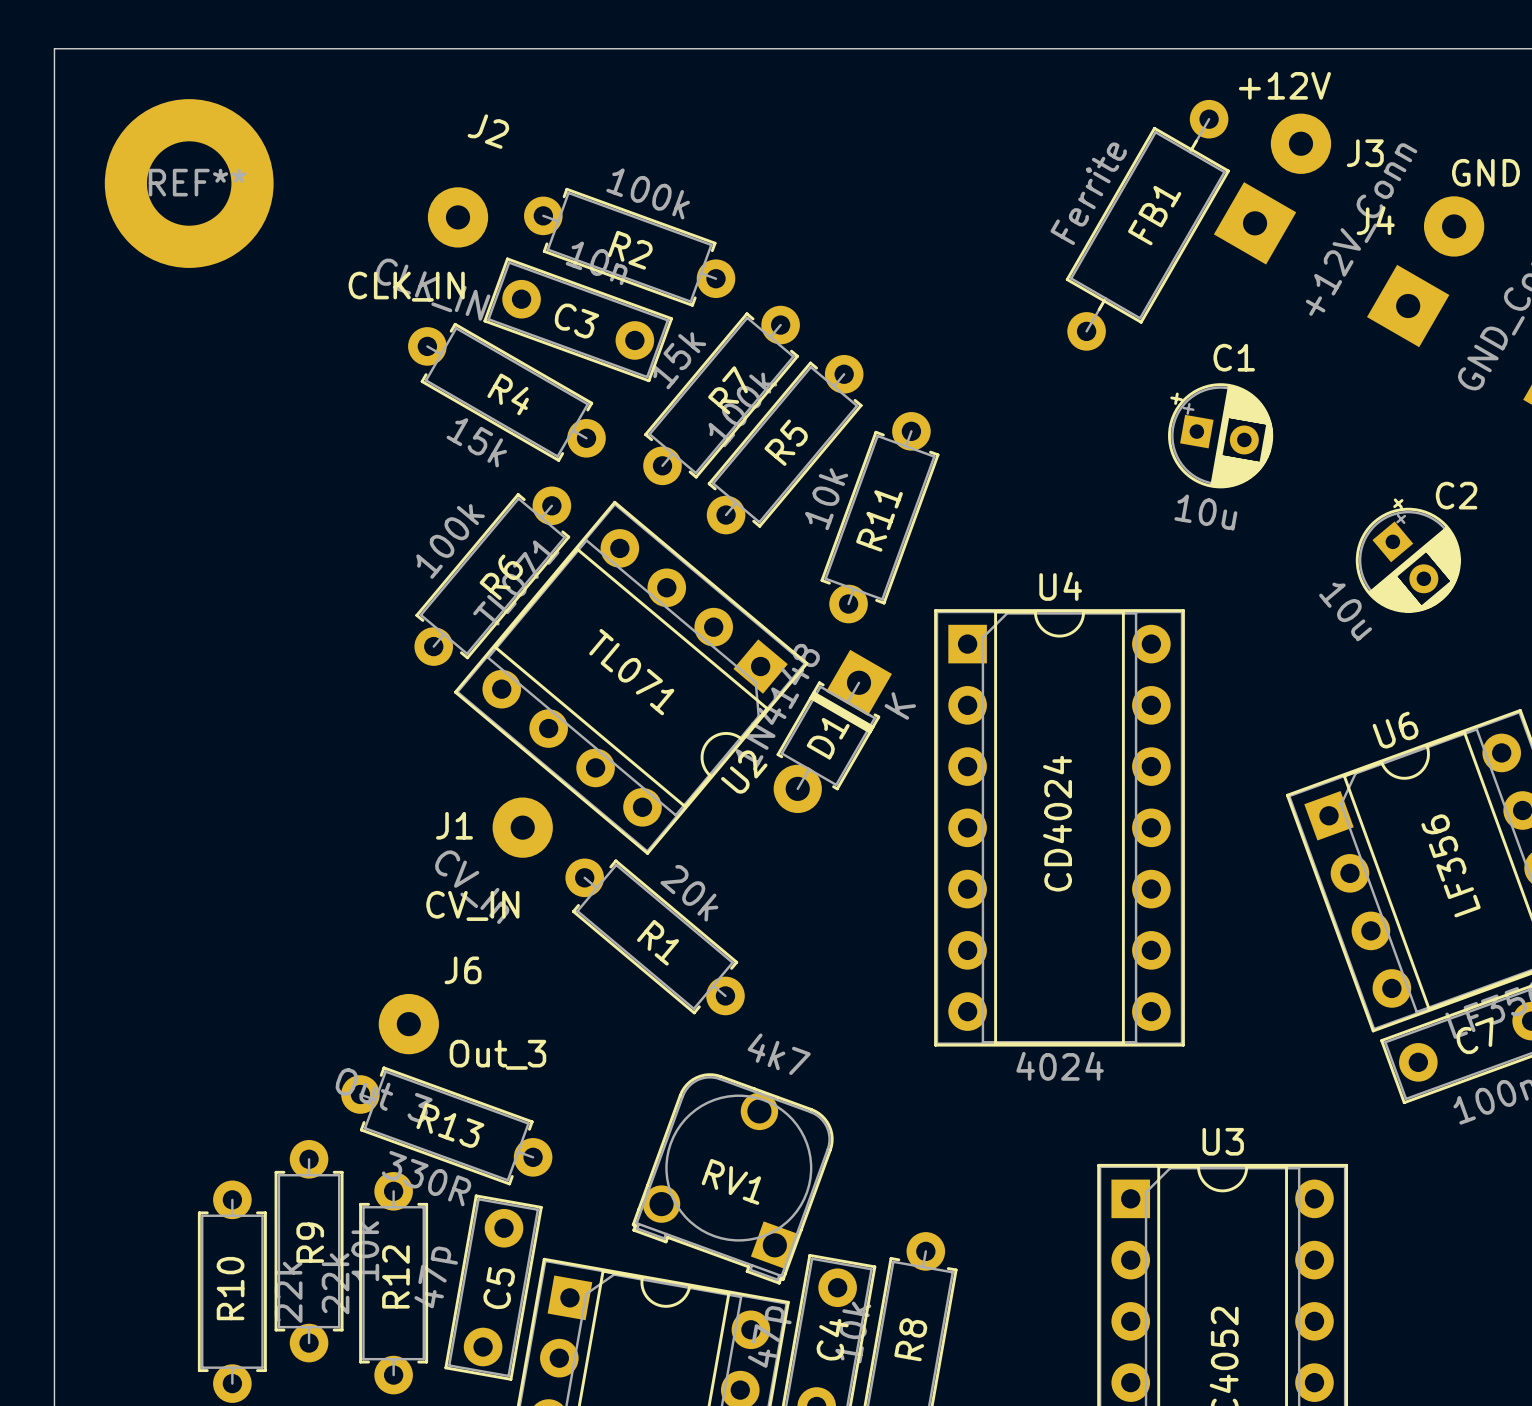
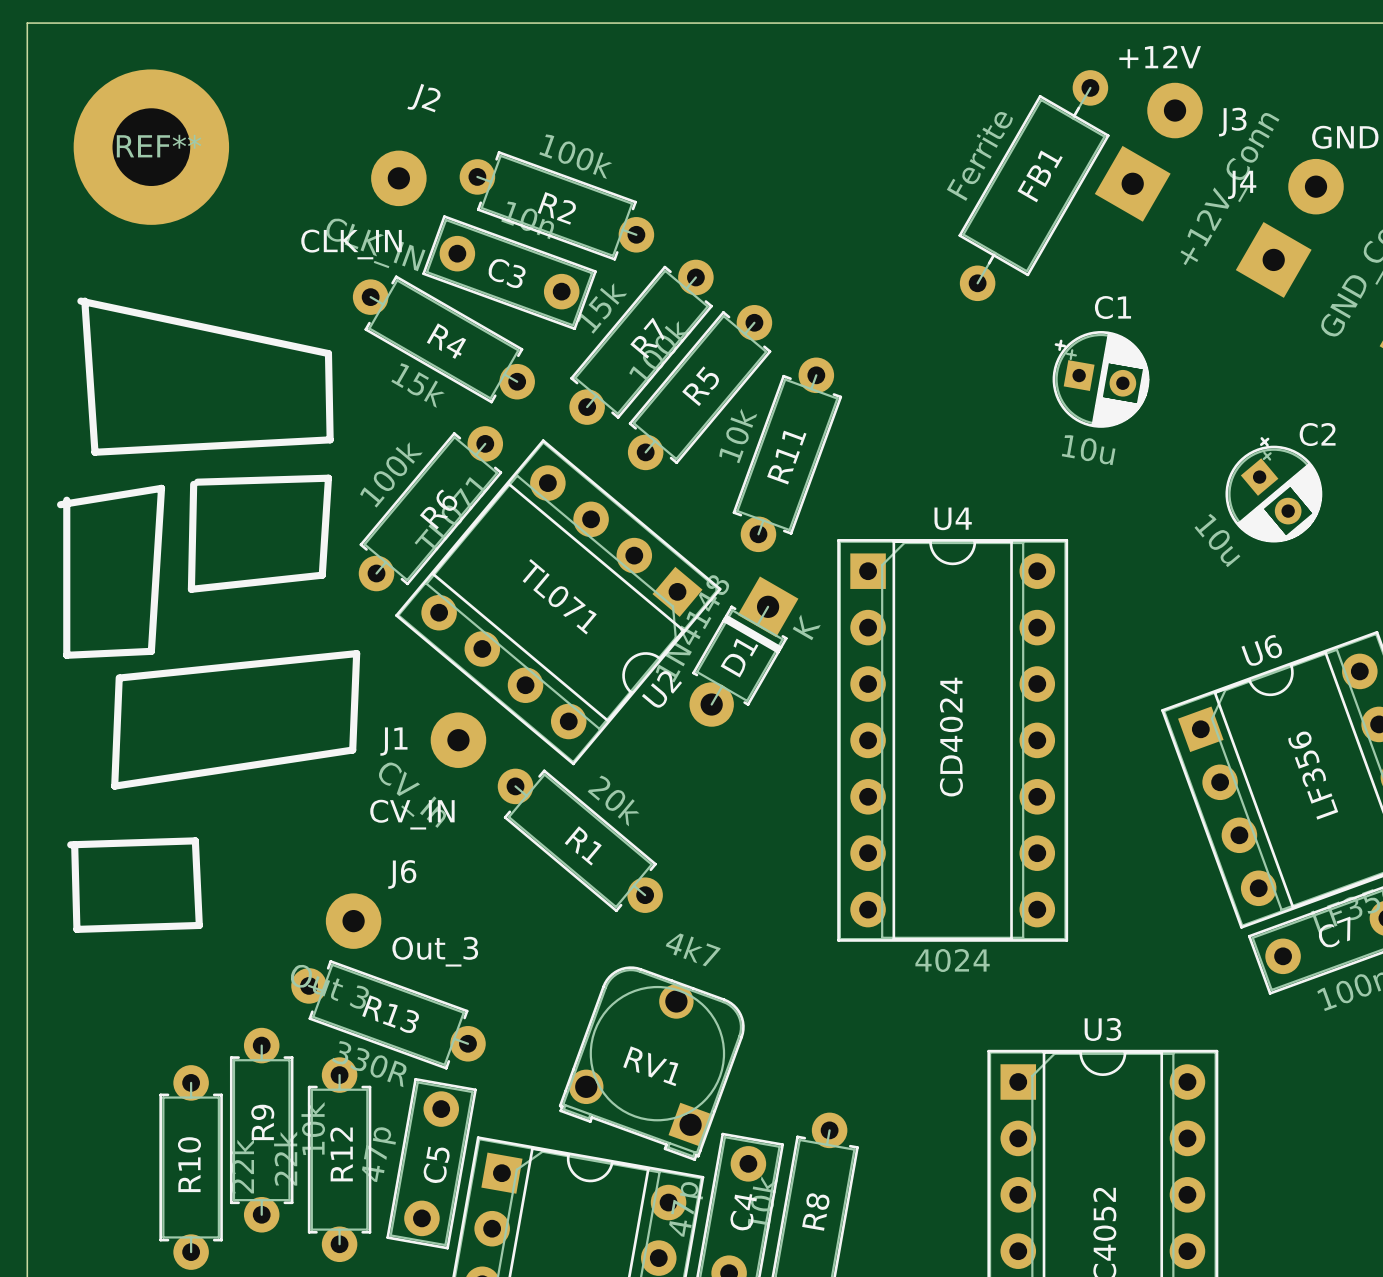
line: none -> (80, 301) (328, 353) (330, 439) (94, 452) (84, 301)
line: none -> (197, 482) (328, 478) (322, 575) (191, 589) (193, 484)
line: none -> (66, 500) (66, 655) (151, 651) (161, 488) (60, 504)
line: none -> (119, 677) (114, 786) (352, 750) (356, 653) (120, 677)
line: none -> (70, 844) (195, 840) (199, 925) (76, 929) (74, 844)

